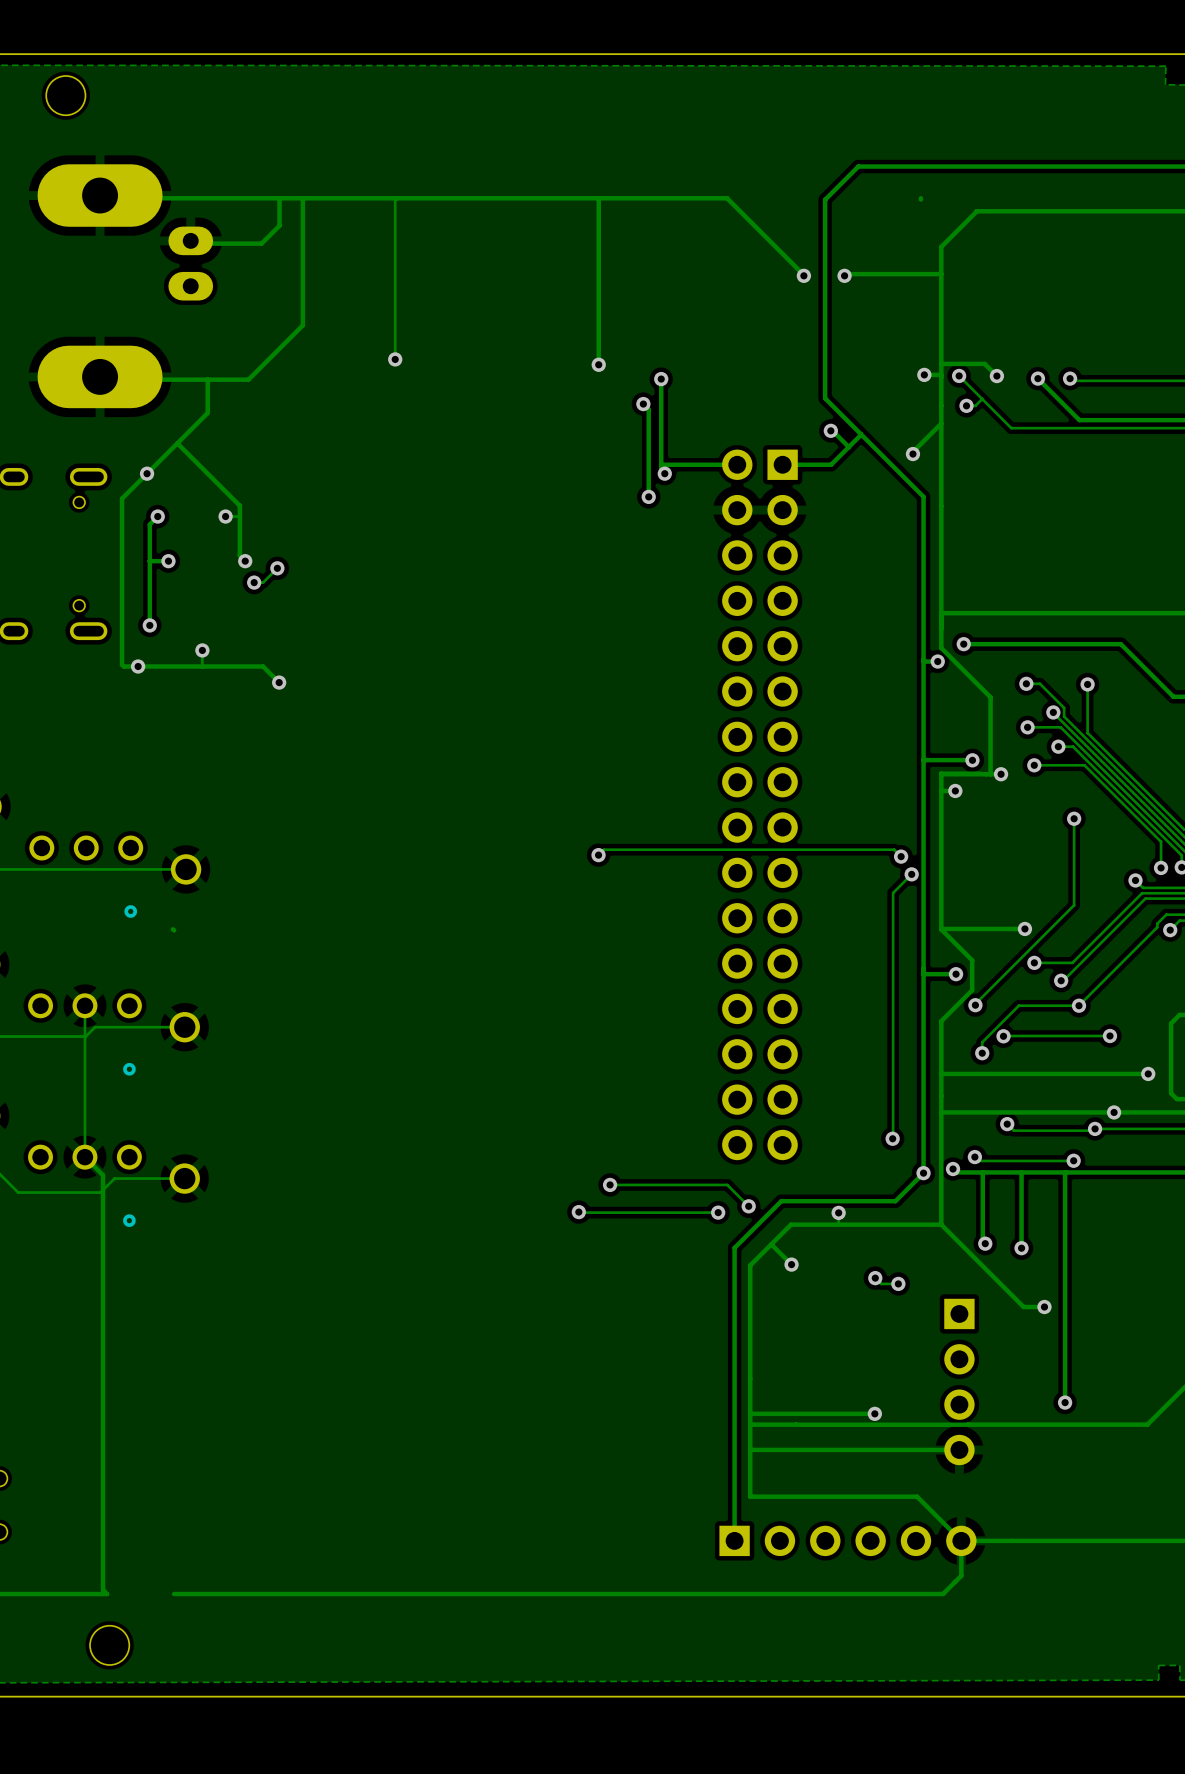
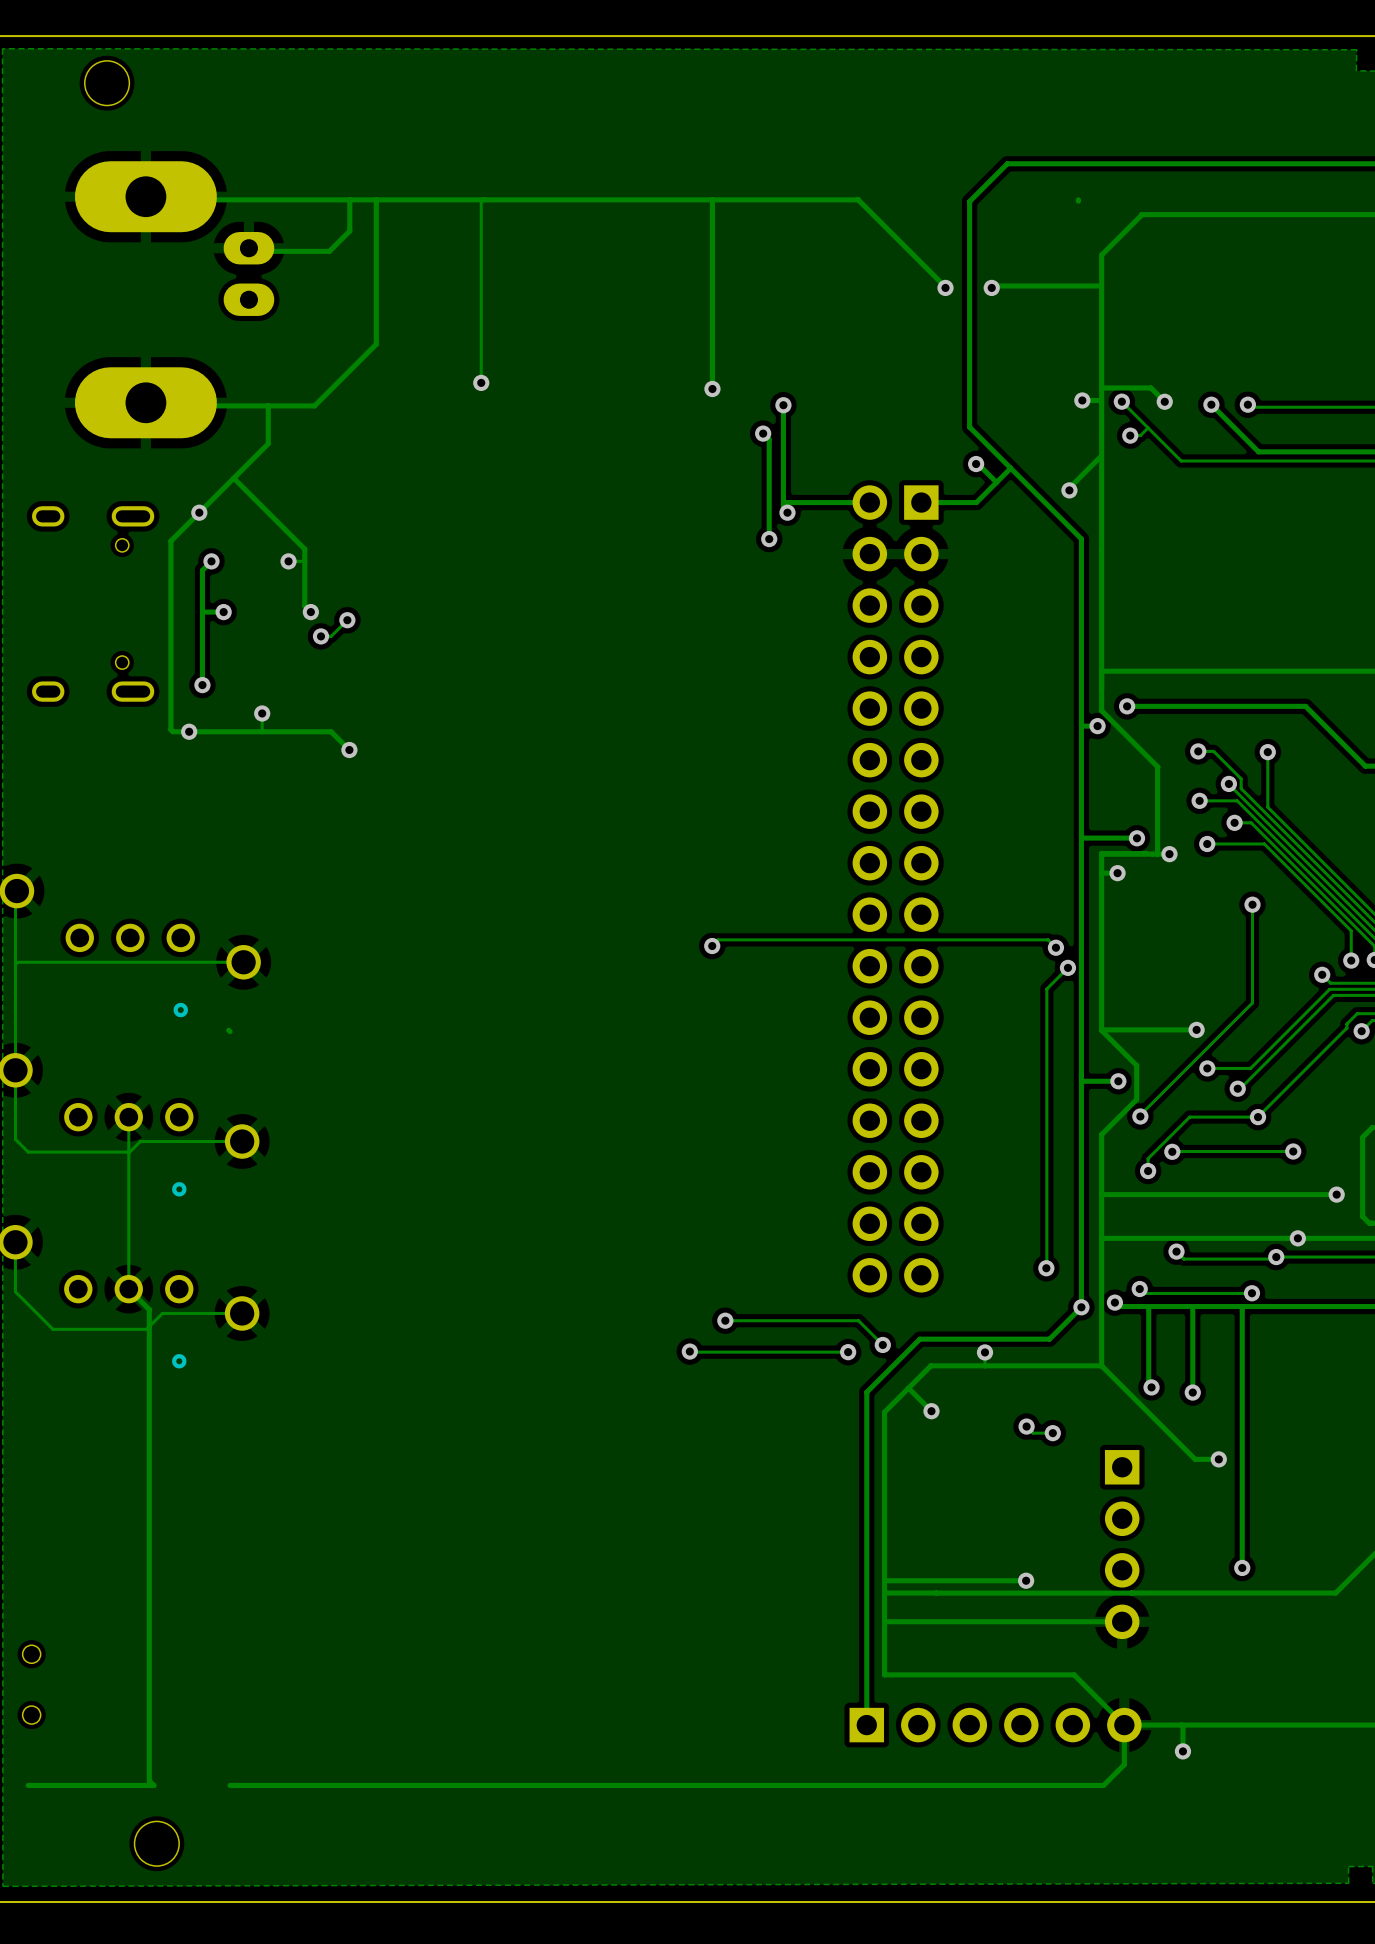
track: none -> (1181, 1725) (1182, 1751)
via: none -> (1182, 1751)

